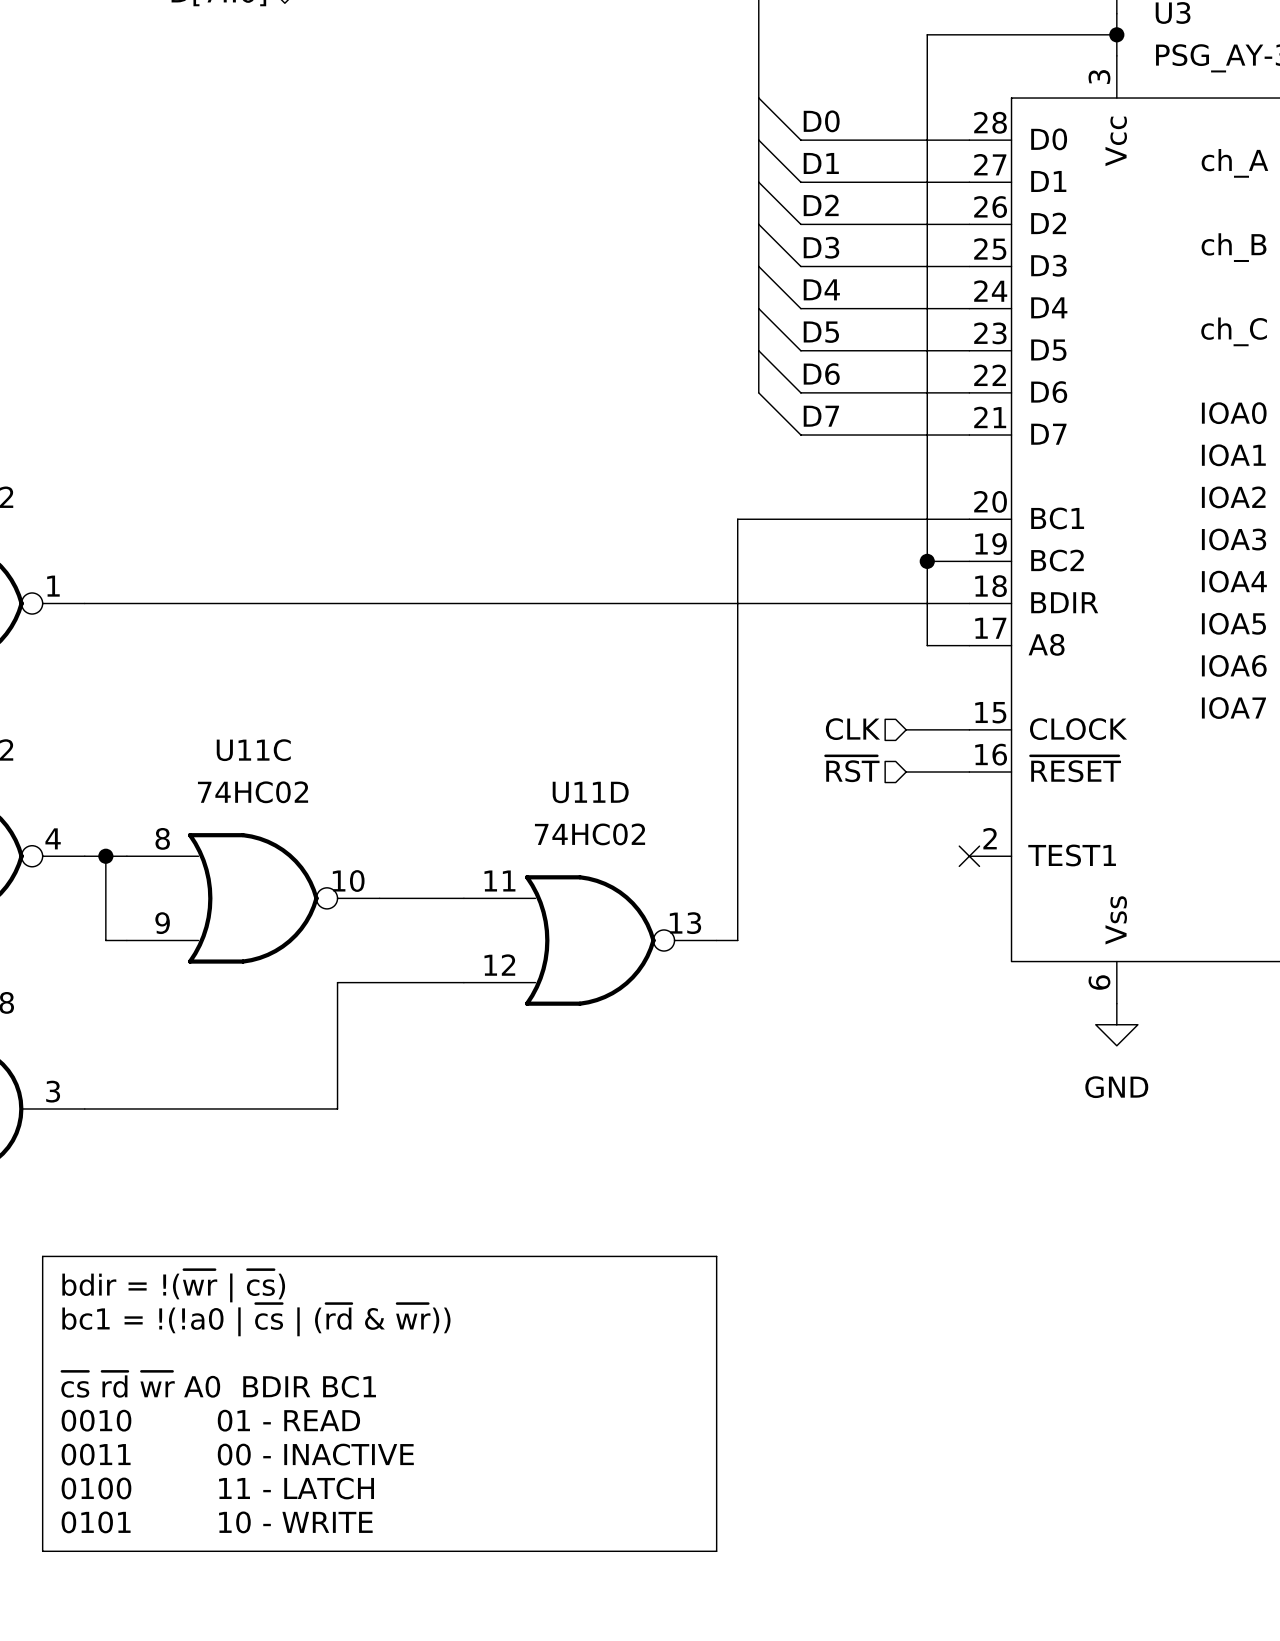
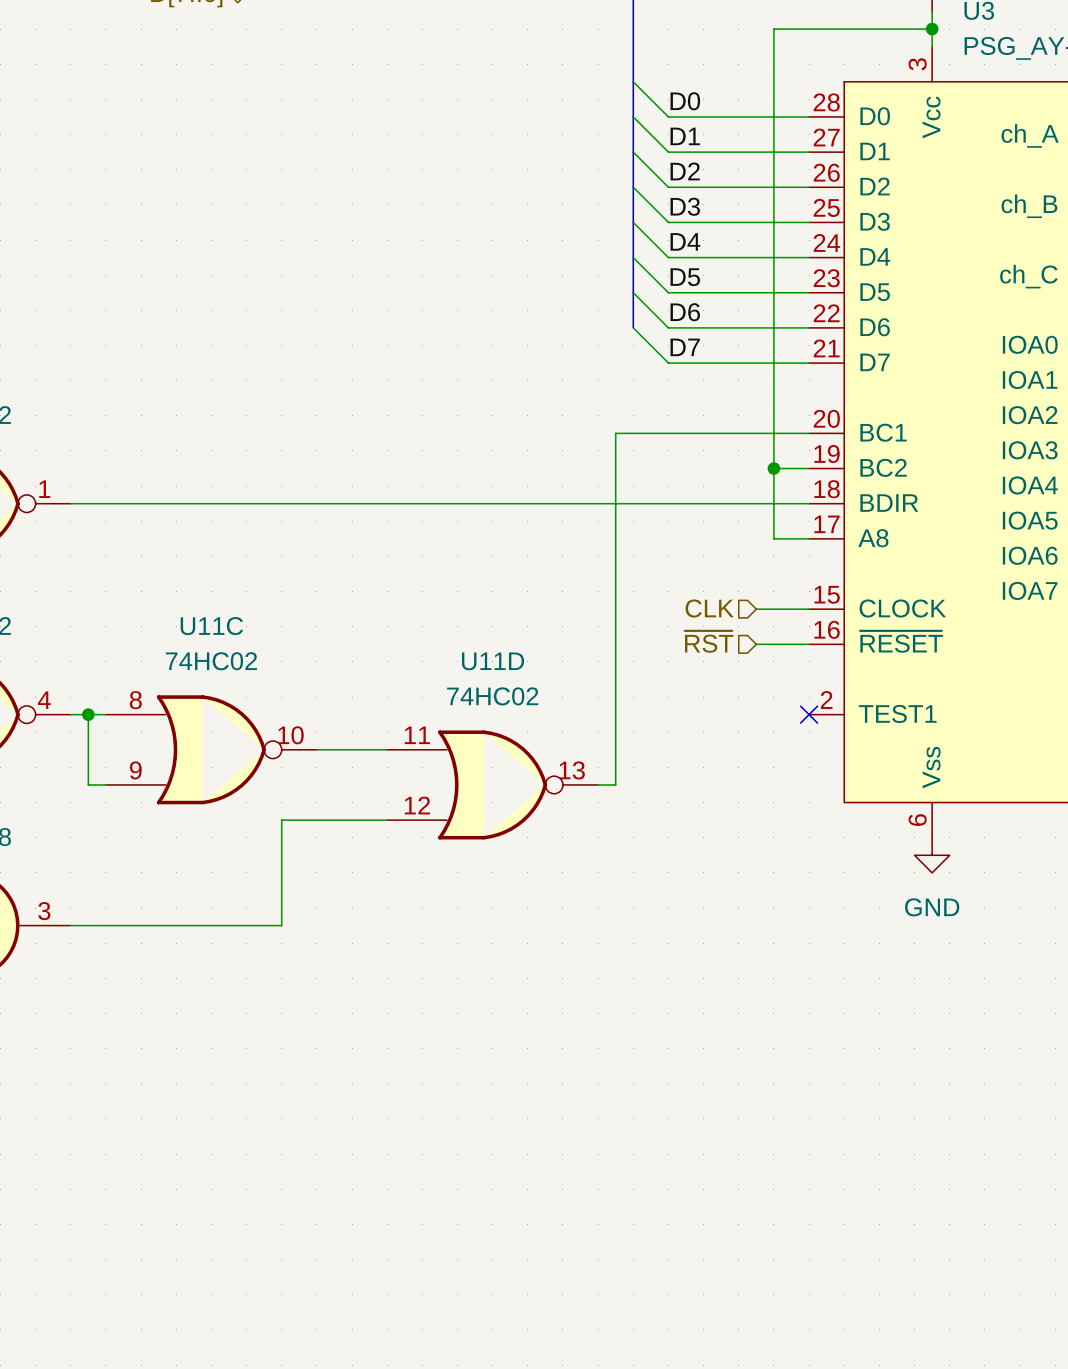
line: (42, 1256) (716, 1256) (716, 1551) (42, 1551) (42, 1256) -> none
text: bdir = !(~{wr} | ~{cs}) (173, 1286) -> none
text: bc1 = !(!a0 | ~{cs} | (~{rd} & ~{wr})) (256, 1319) -> none
text: ~{cs} ~{rd} ~{wr} A0 BDIR BC1 (218, 1384) -> none
text: 0010 01 - READ (210, 1420) -> none
text: 0011 00 - INACTIVE (237, 1454) -> none
text: 0100 11 - LATCH (217, 1488) -> none
text: 0101 10 - WRITE (217, 1522) -> none

